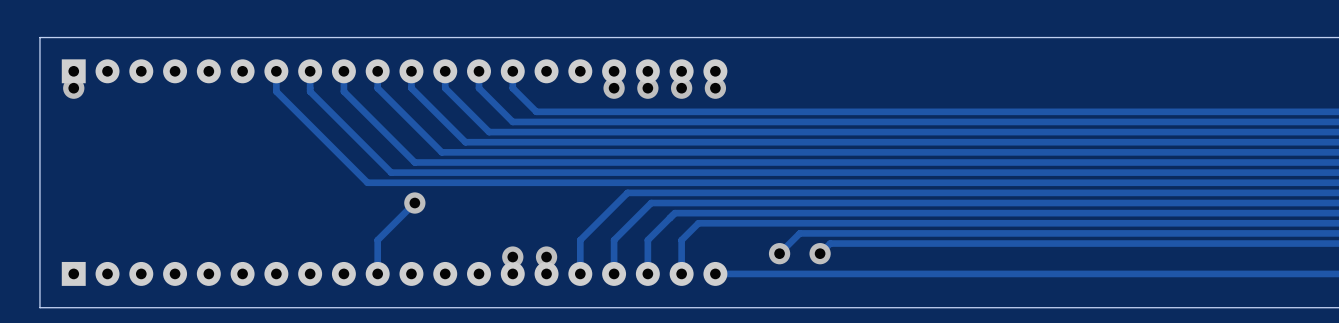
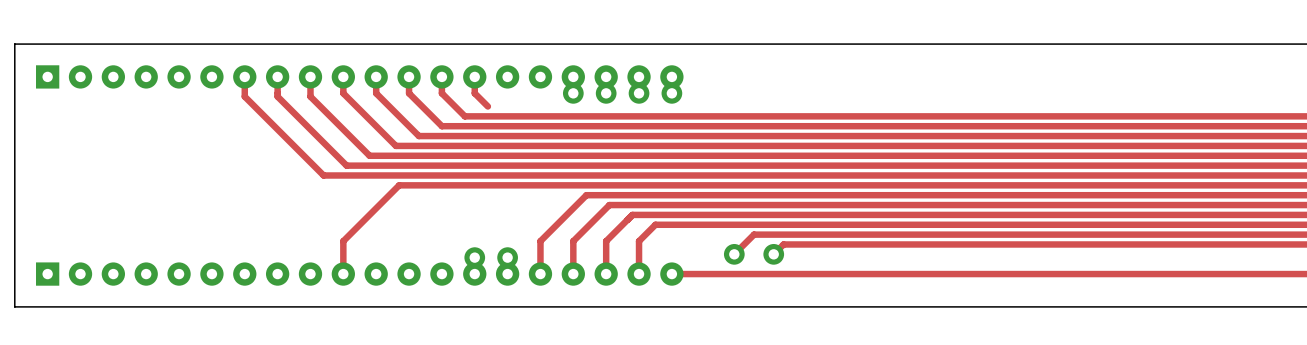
via: (73, 88) -> none
track: (526, 101) (536, 111) -> (464, 116) (497, 116)
track: (502, 111) (512, 121) -> (441, 126) (474, 126)
track: (479, 121) (489, 132) -> (418, 136) (451, 136)
track: (455, 132) (465, 142) -> (395, 145) (428, 145)
track: (431, 142) (441, 152) -> (369, 155) (405, 155)
track: (404, 152) (414, 162) -> (346, 165) (379, 165)
track: (381, 162) (391, 172) -> (323, 175) (356, 175)
track: (357, 172) (367, 182) (435, 182) -> (379, 205) (399, 185)
via: (414, 203) -> none

